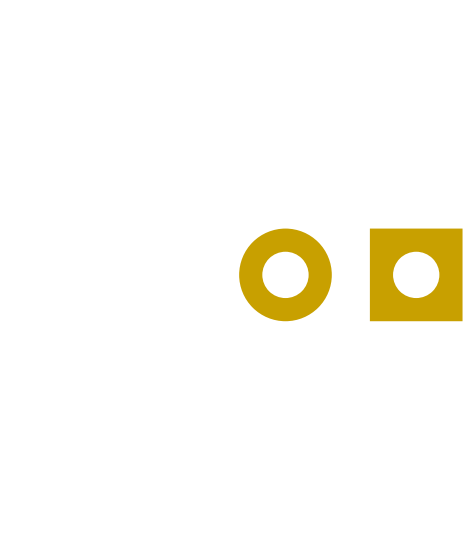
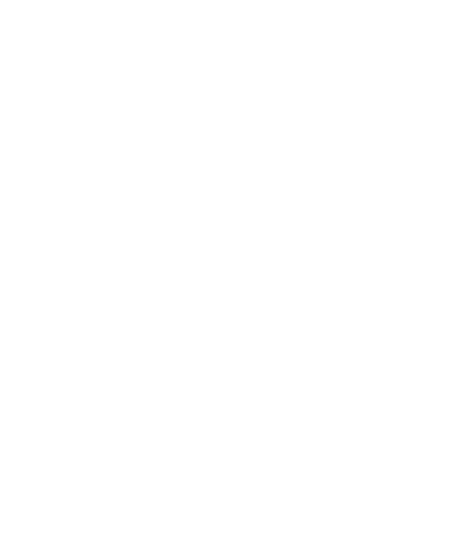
part: (350, 274) -> none

